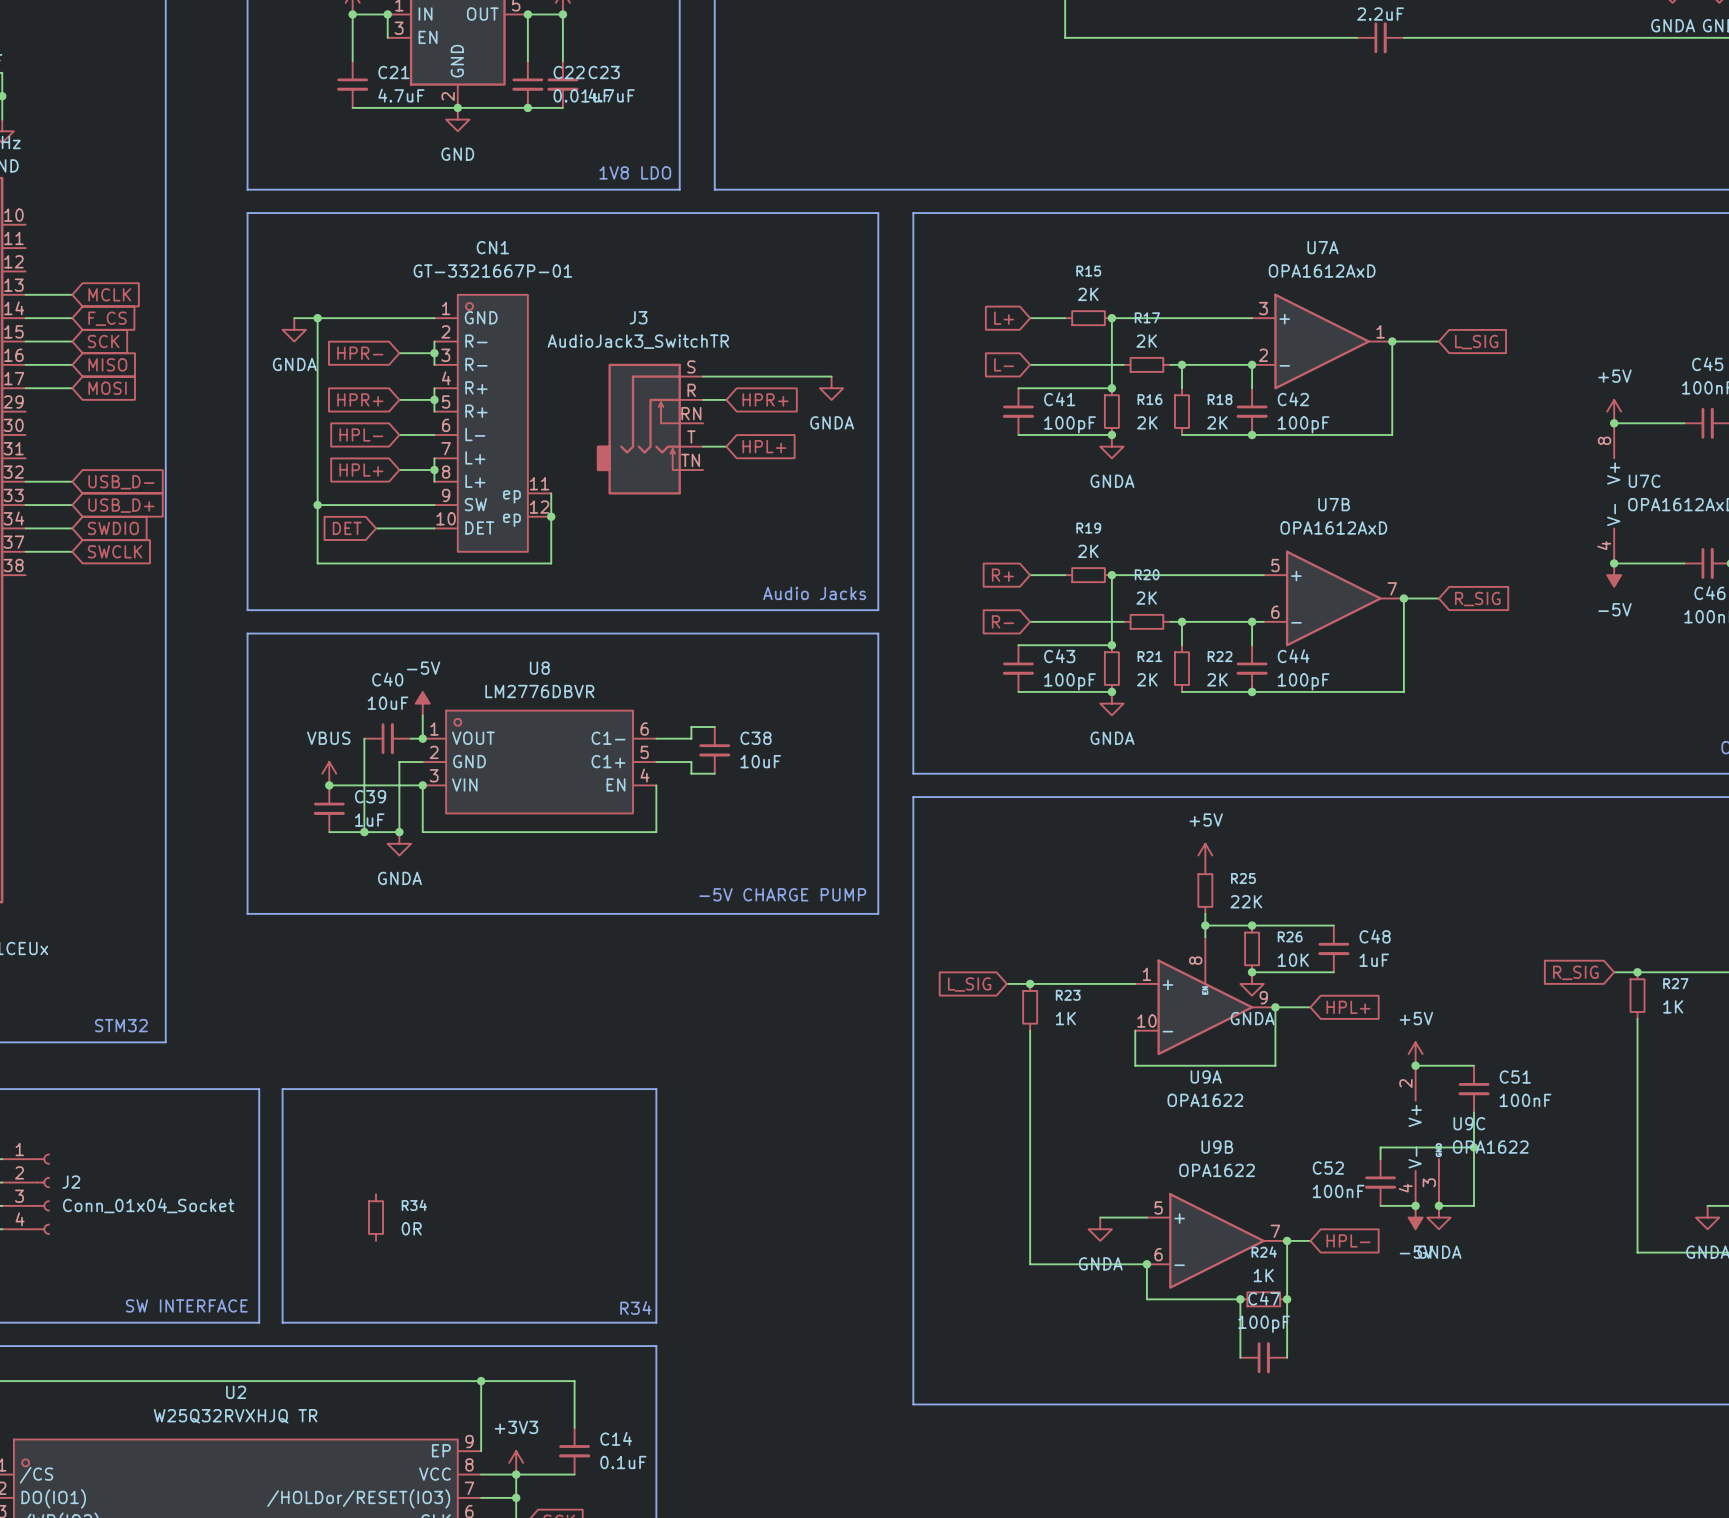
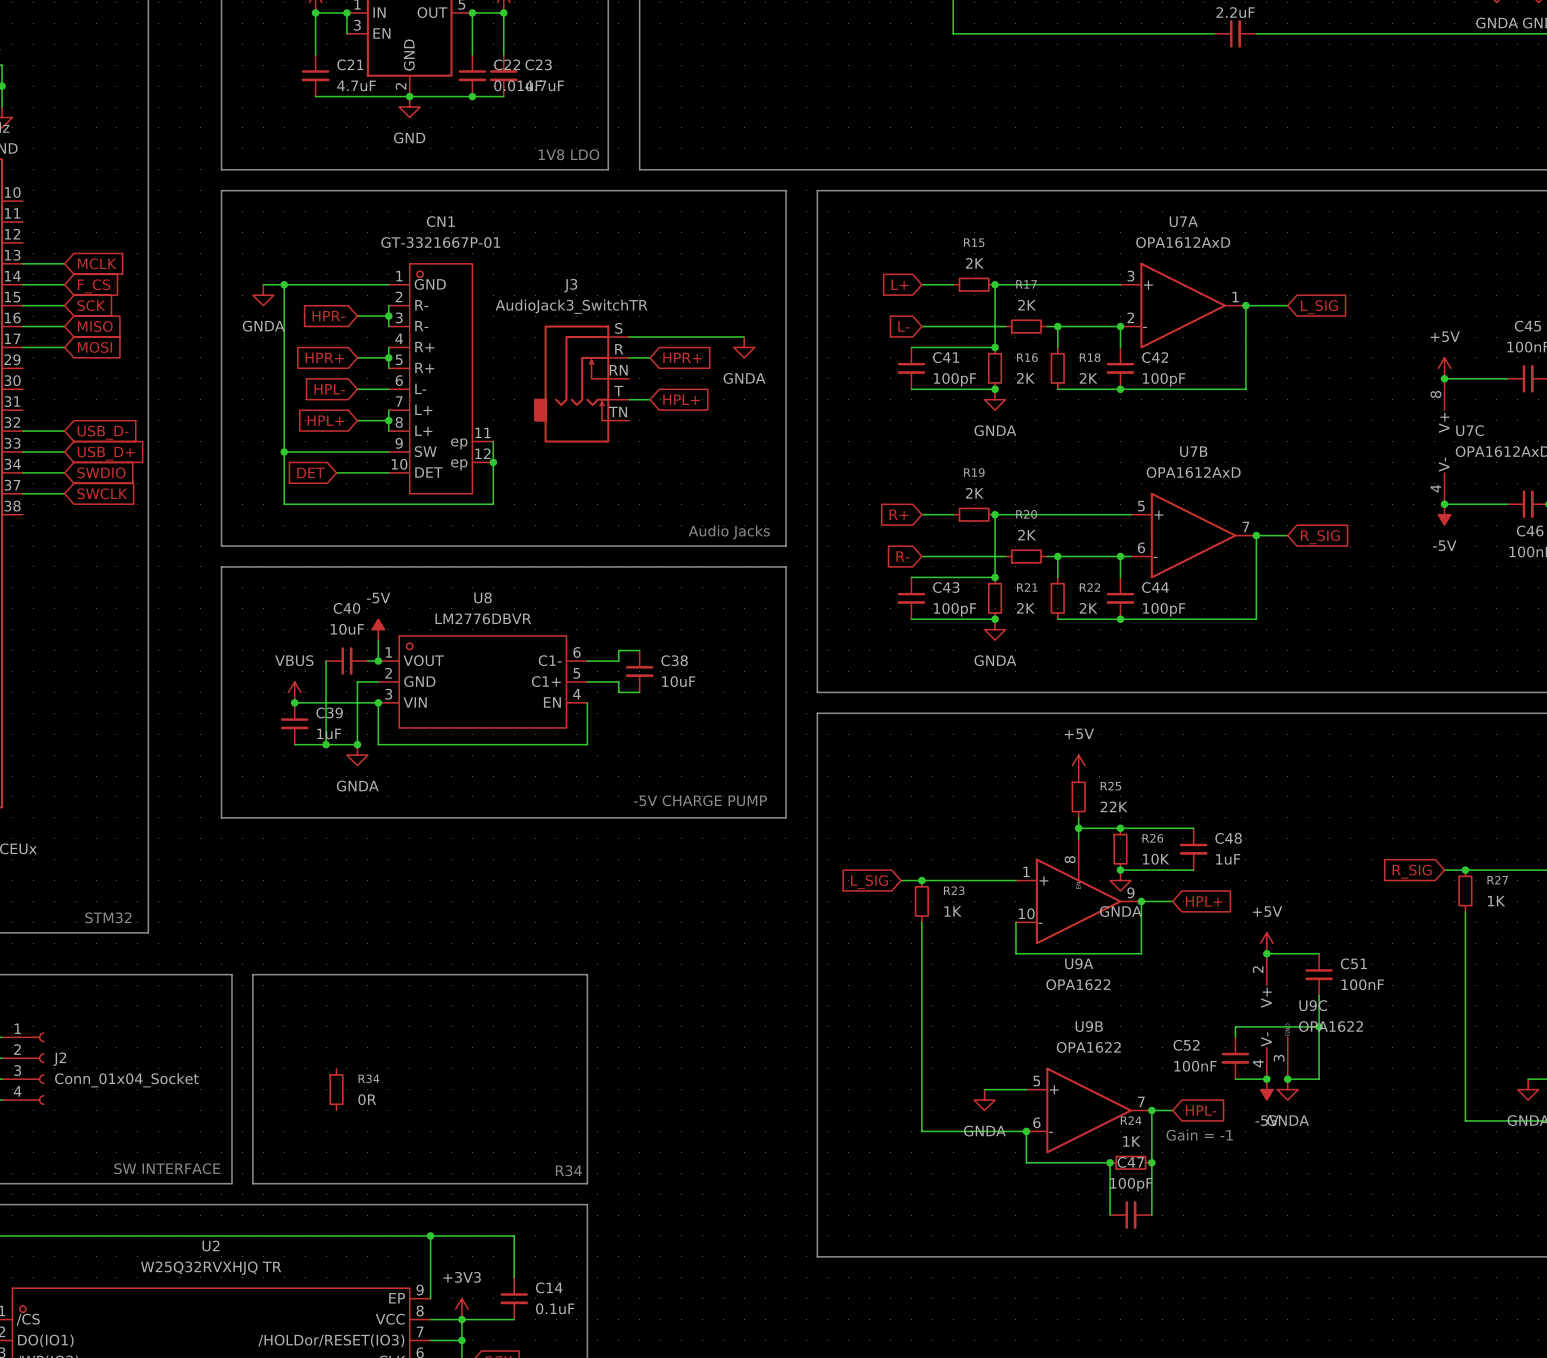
text: none -> Gain = -1 (1199, 1135)

